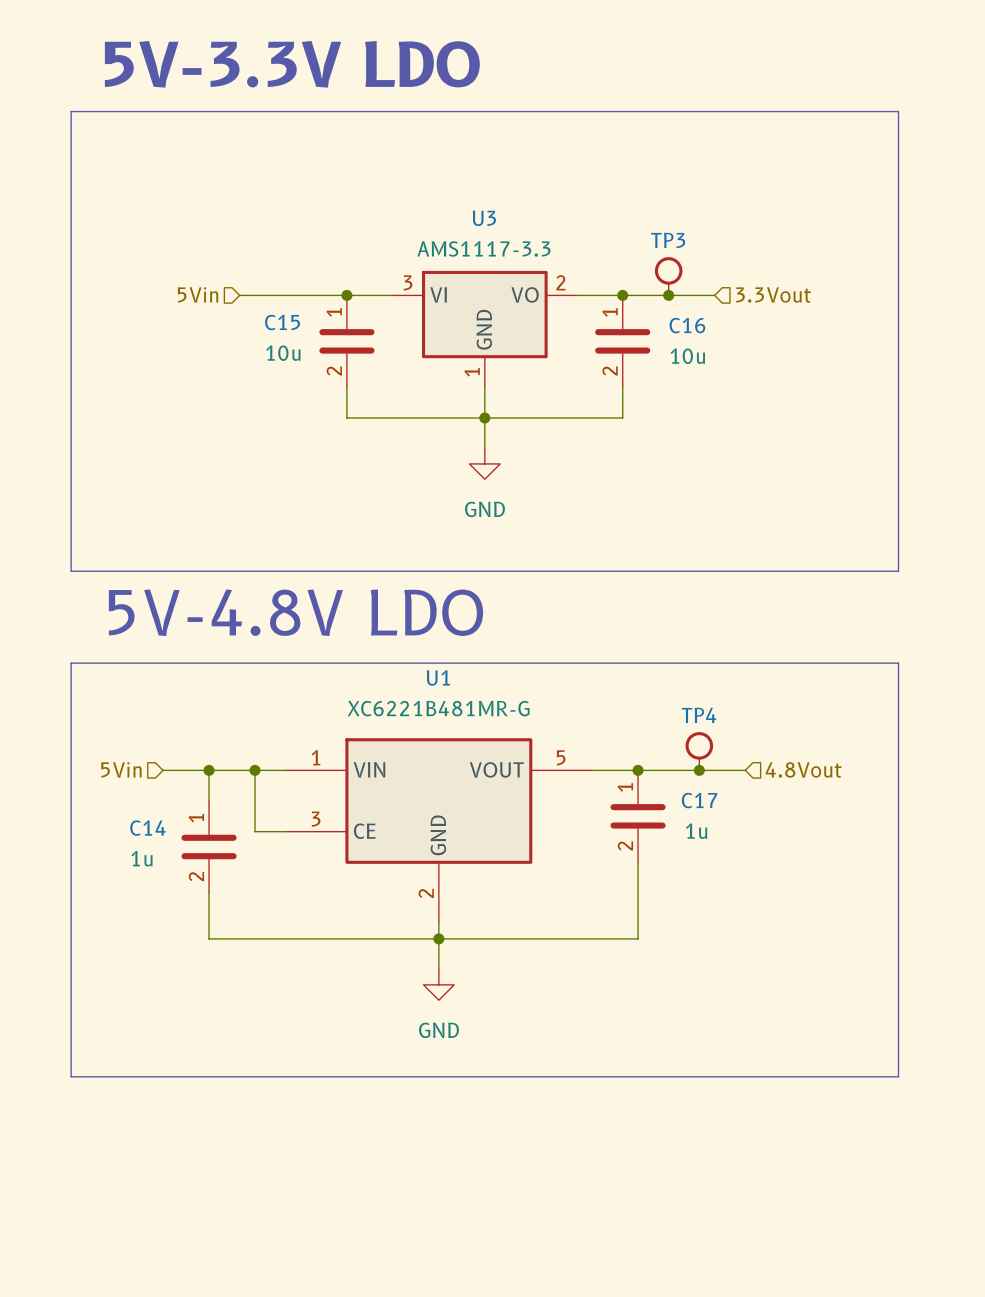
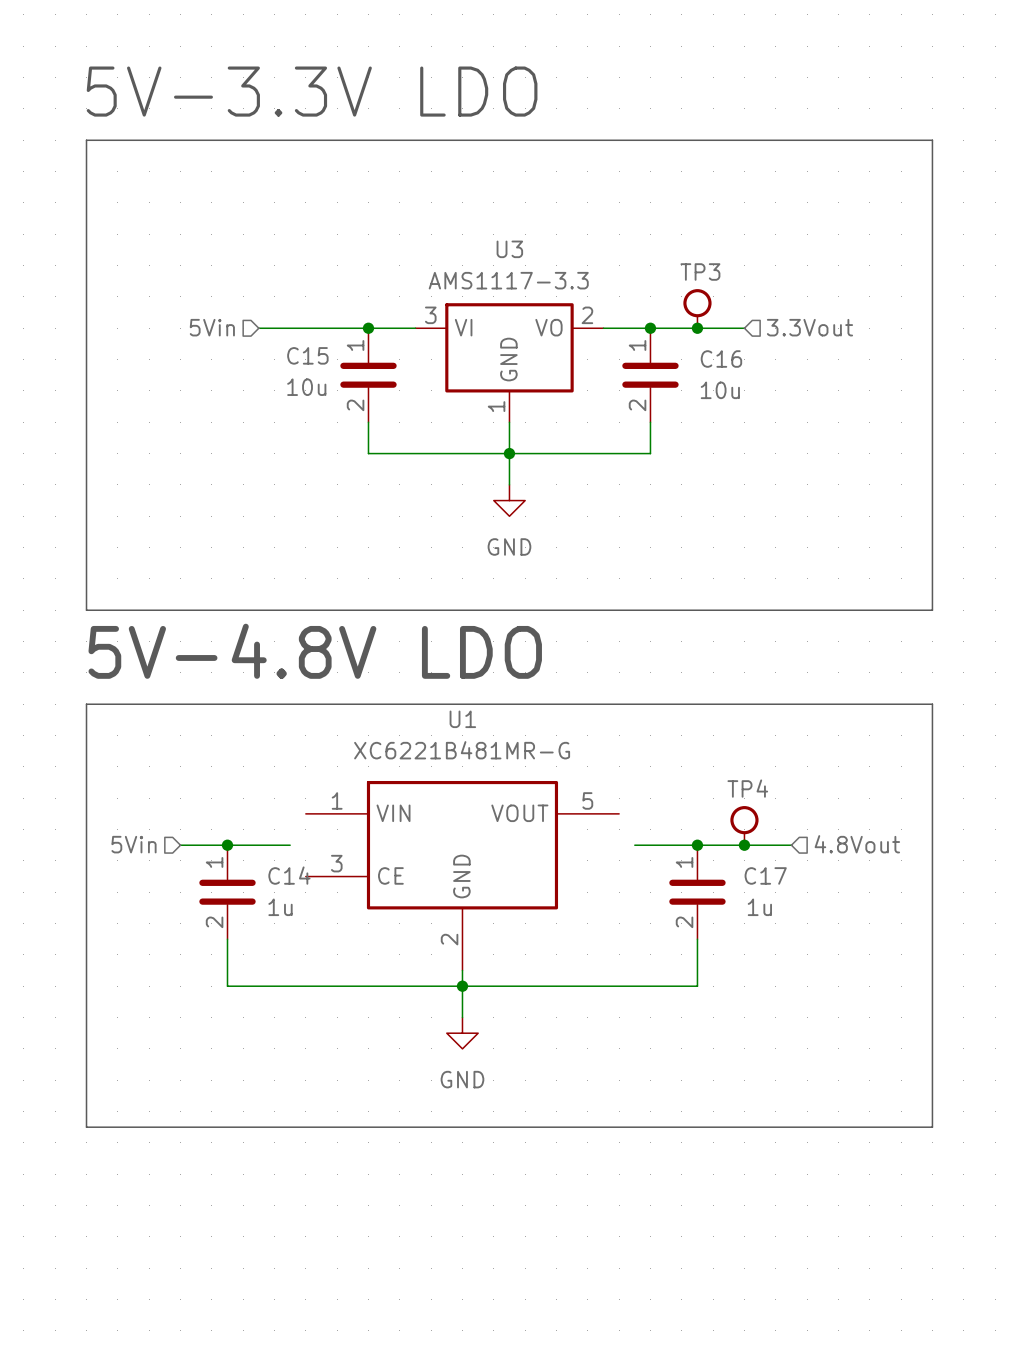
TP4 position: (699, 751) -> (744, 825)
hierarchical label position: 5Vin (121, 769) -> 5Vin (134, 844)
hierarchical label position: 4.8Vout (803, 769) -> 4.8Vout (857, 844)
wire: (163, 770) (285, 770) -> none
wire: (209, 770) (209, 801) -> none
junction: (209, 770) -> none
wire: (255, 770) (255, 831) (285, 831) -> none
junction: (255, 770) -> none
wire: (592, 770) (745, 770) -> (634, 845) (791, 845)
junction: (638, 770) -> none
junction: (699, 770) -> none
wire: none -> (180, 845) (290, 845)
junction: none -> (227, 845)
junction: none -> (697, 845)
junction: none -> (744, 845)
C17 position: (638, 816) -> (697, 892)
C14 name position: C14 (147, 828) -> C14 (289, 875)
C14 value position: 1u (141, 858) -> 1u (280, 907)
wire: (638, 862) (638, 938) -> (697, 939) (697, 986) (666, 986)

